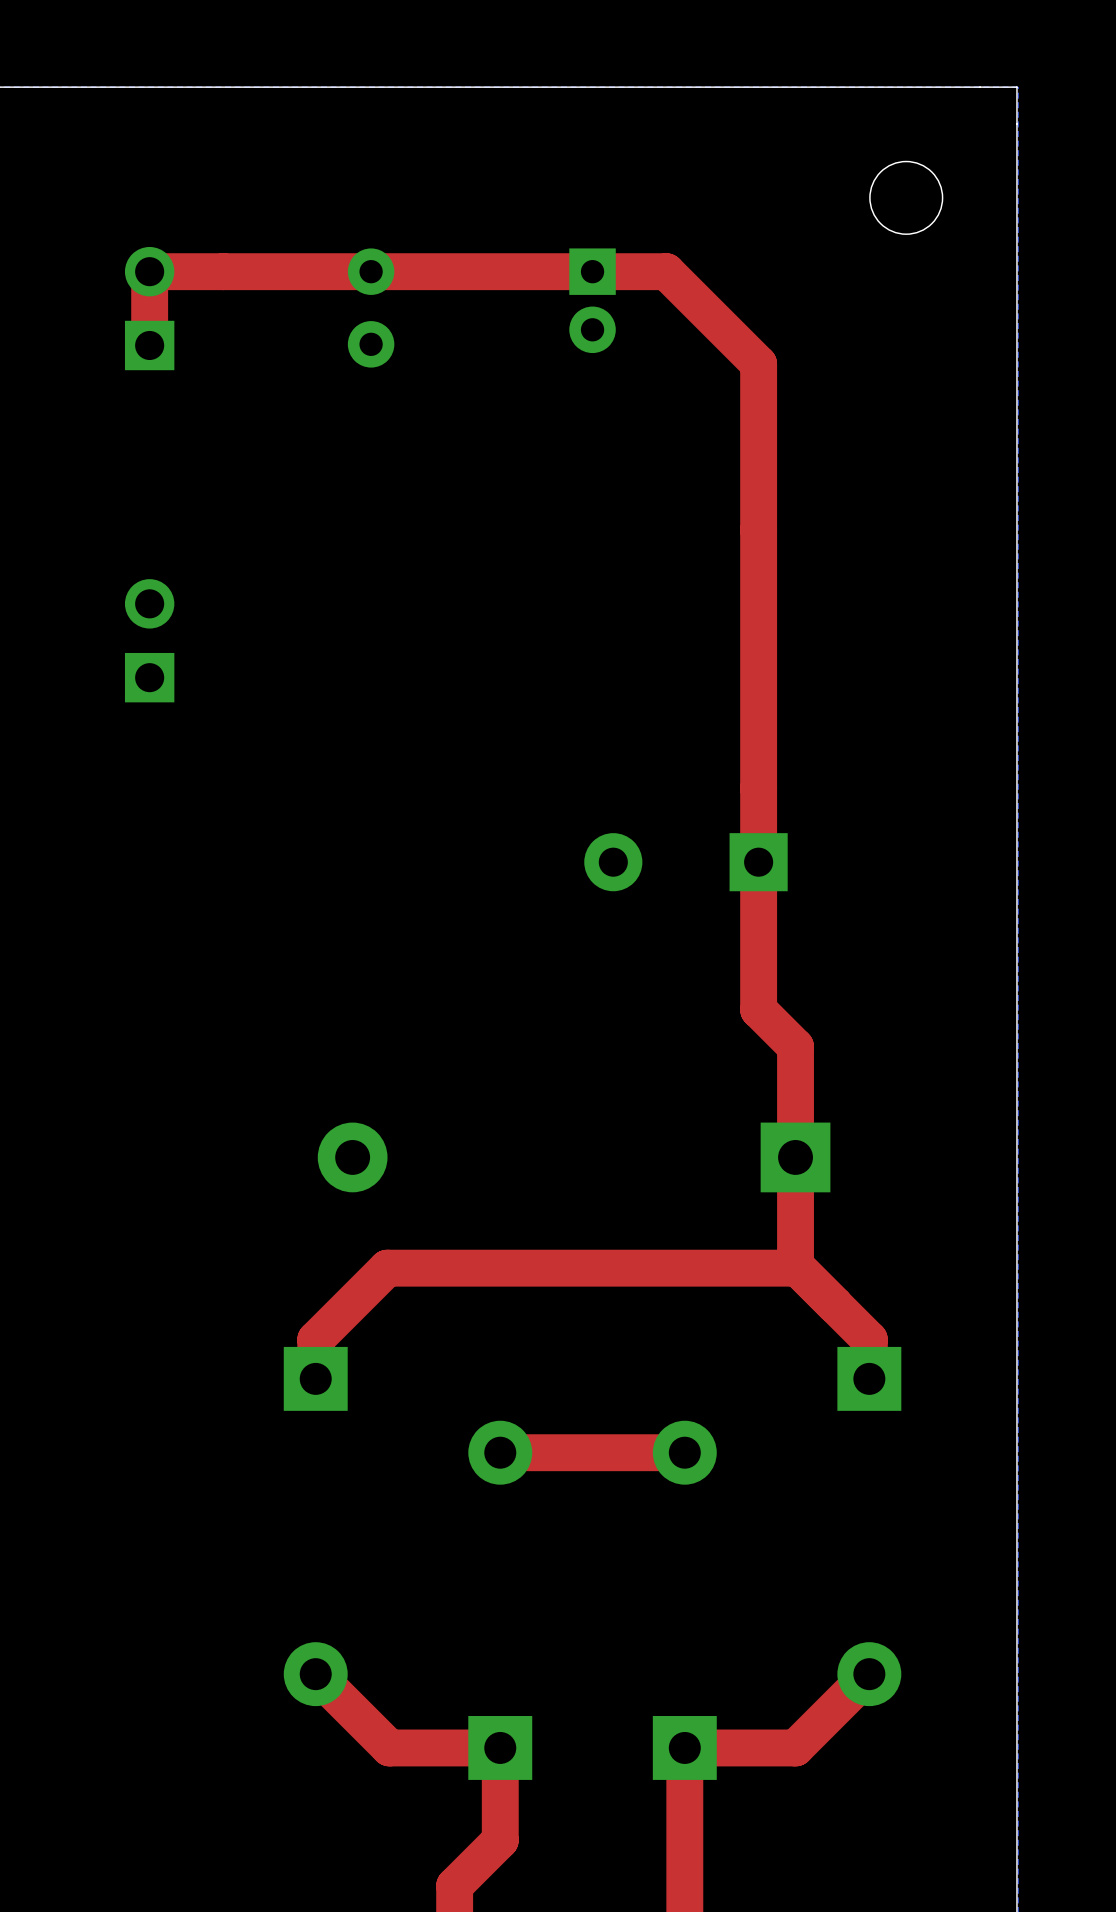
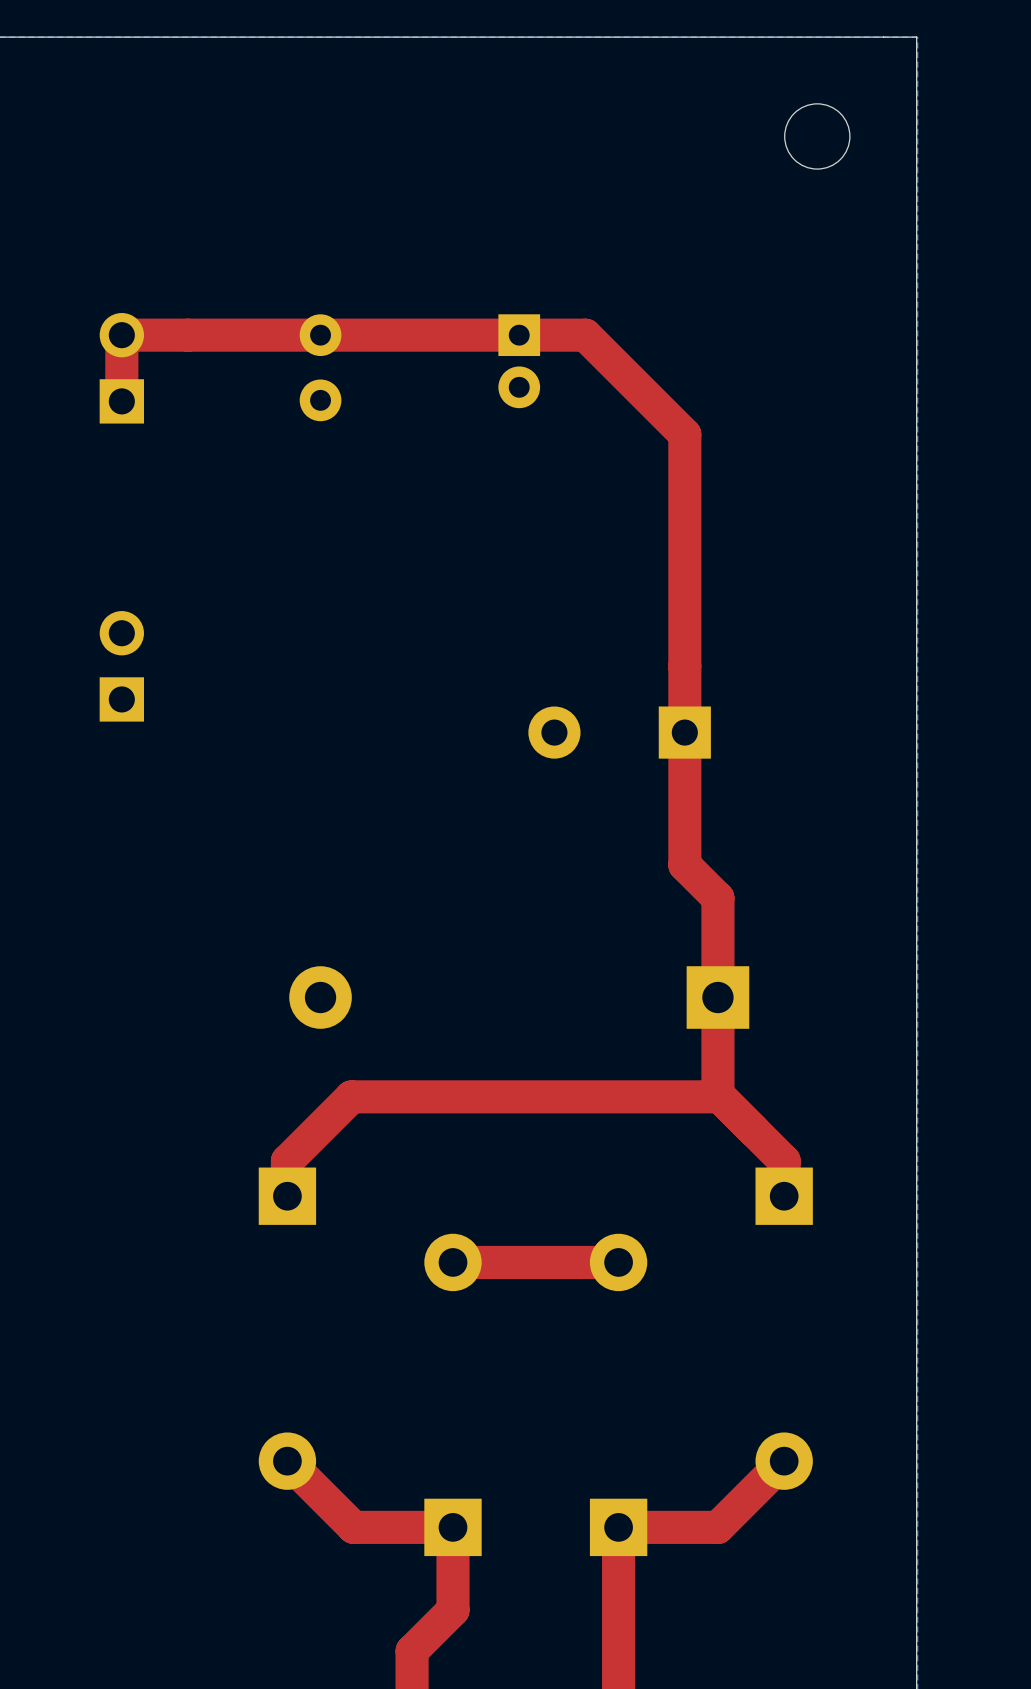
part position: (592, 300) -> (519, 361)
part: (149, 308) -> none
part position: (371, 308) -> (320, 367)
top track: (149, 345) (149, 271) (666, 271) (758, 363) (758, 530) -> (121, 401) (121, 335) (585, 335) (684, 434)
part: none -> (121, 368)
part: (149, 640) -> none
part: none -> (121, 666)

